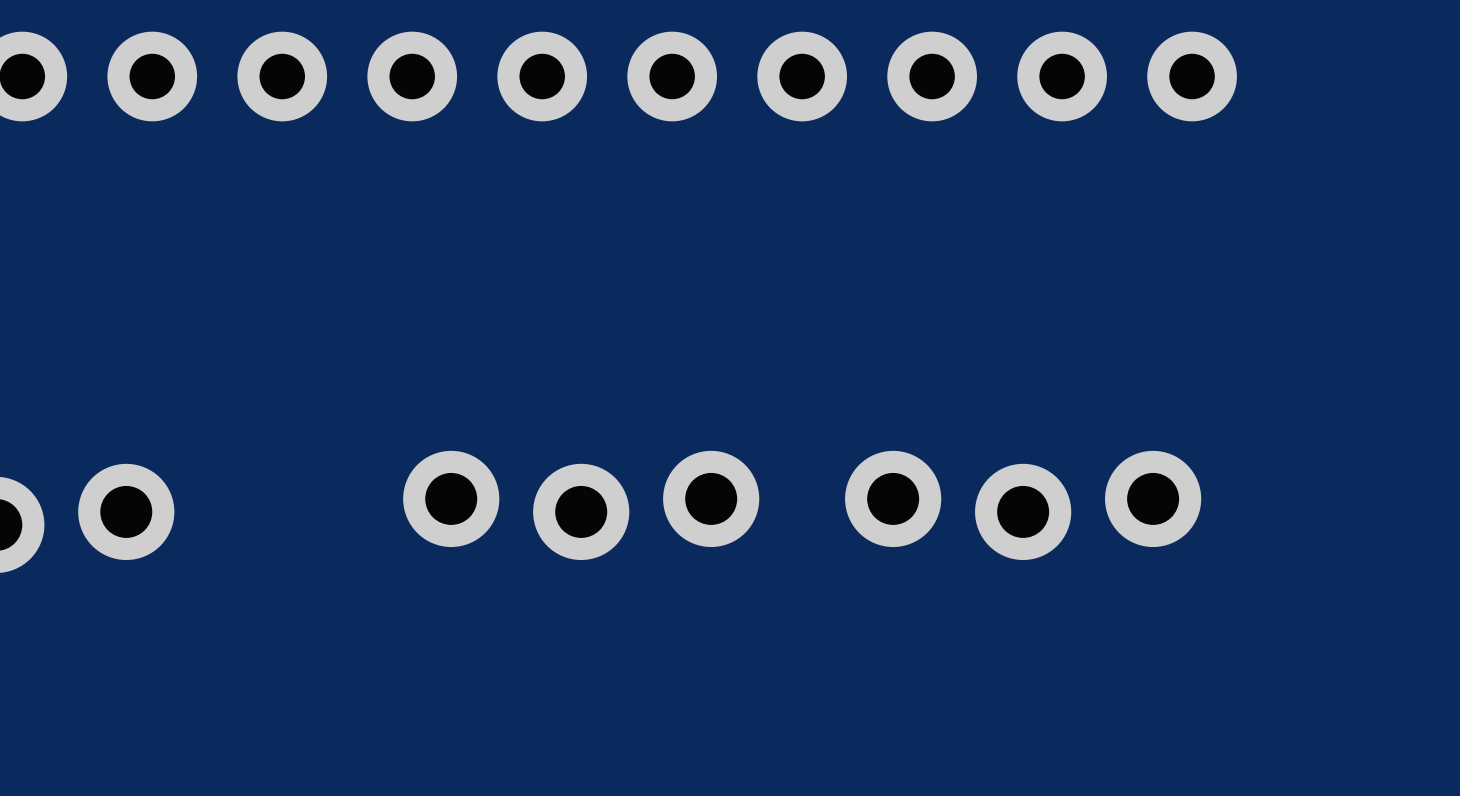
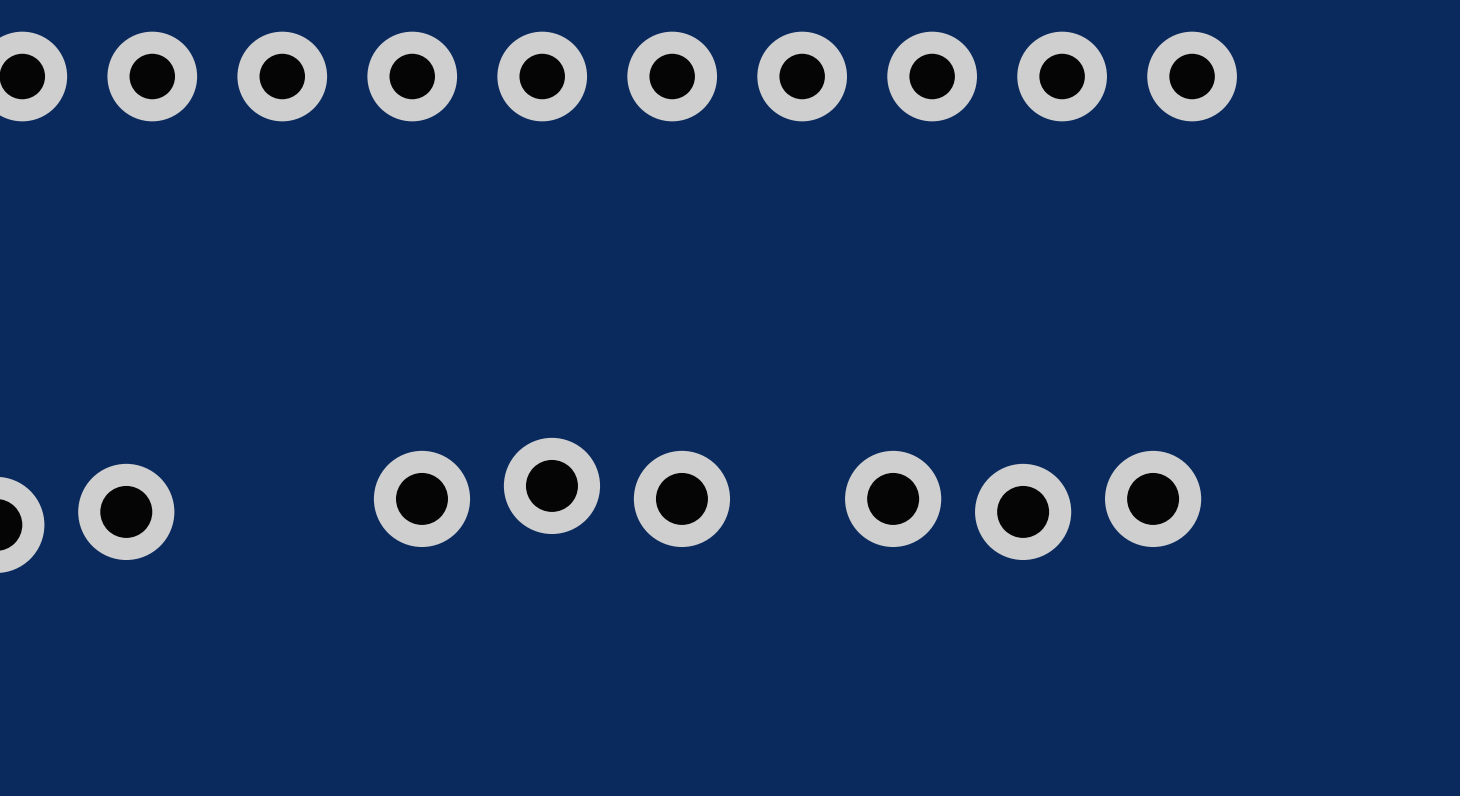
part rotation: 0° (581, 505) -> 180° (551, 492)

